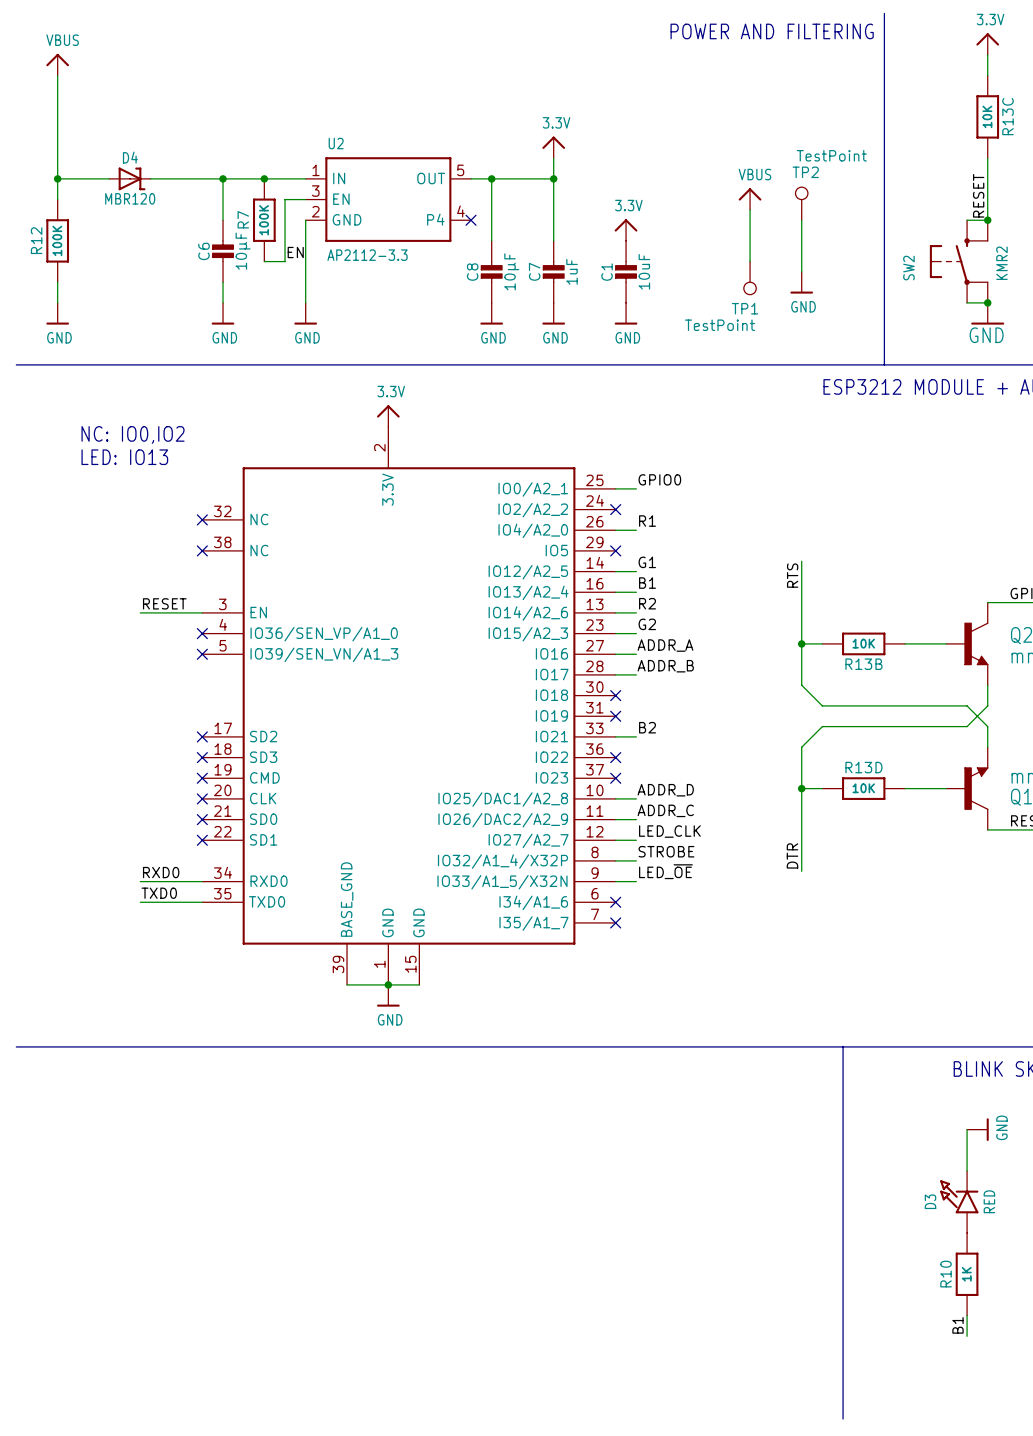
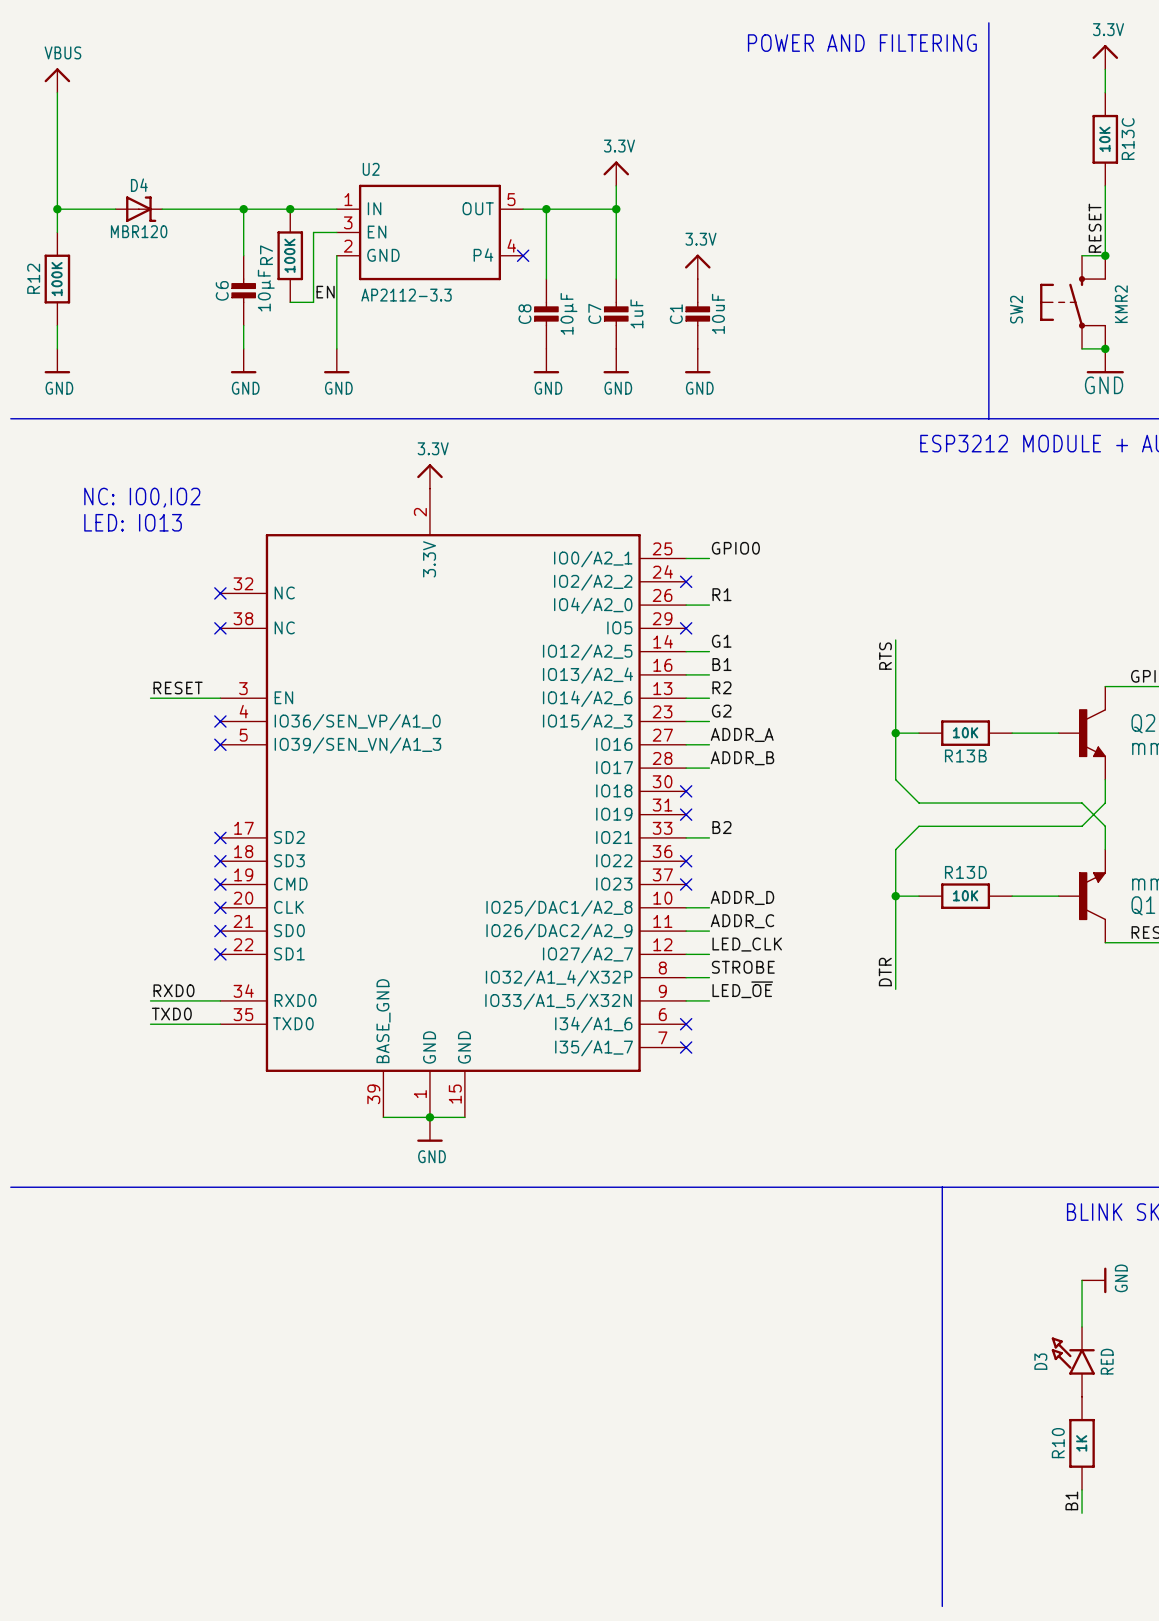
power symbol: VBUS (750, 199) -> none
TP2: TestPoint (801, 203) -> none
wire: (750, 209) (750, 261) -> none
wire: (801, 220) (801, 271) -> none
TP1: TestPoint (750, 278) -> none
power symbol: GND (801, 282) -> none

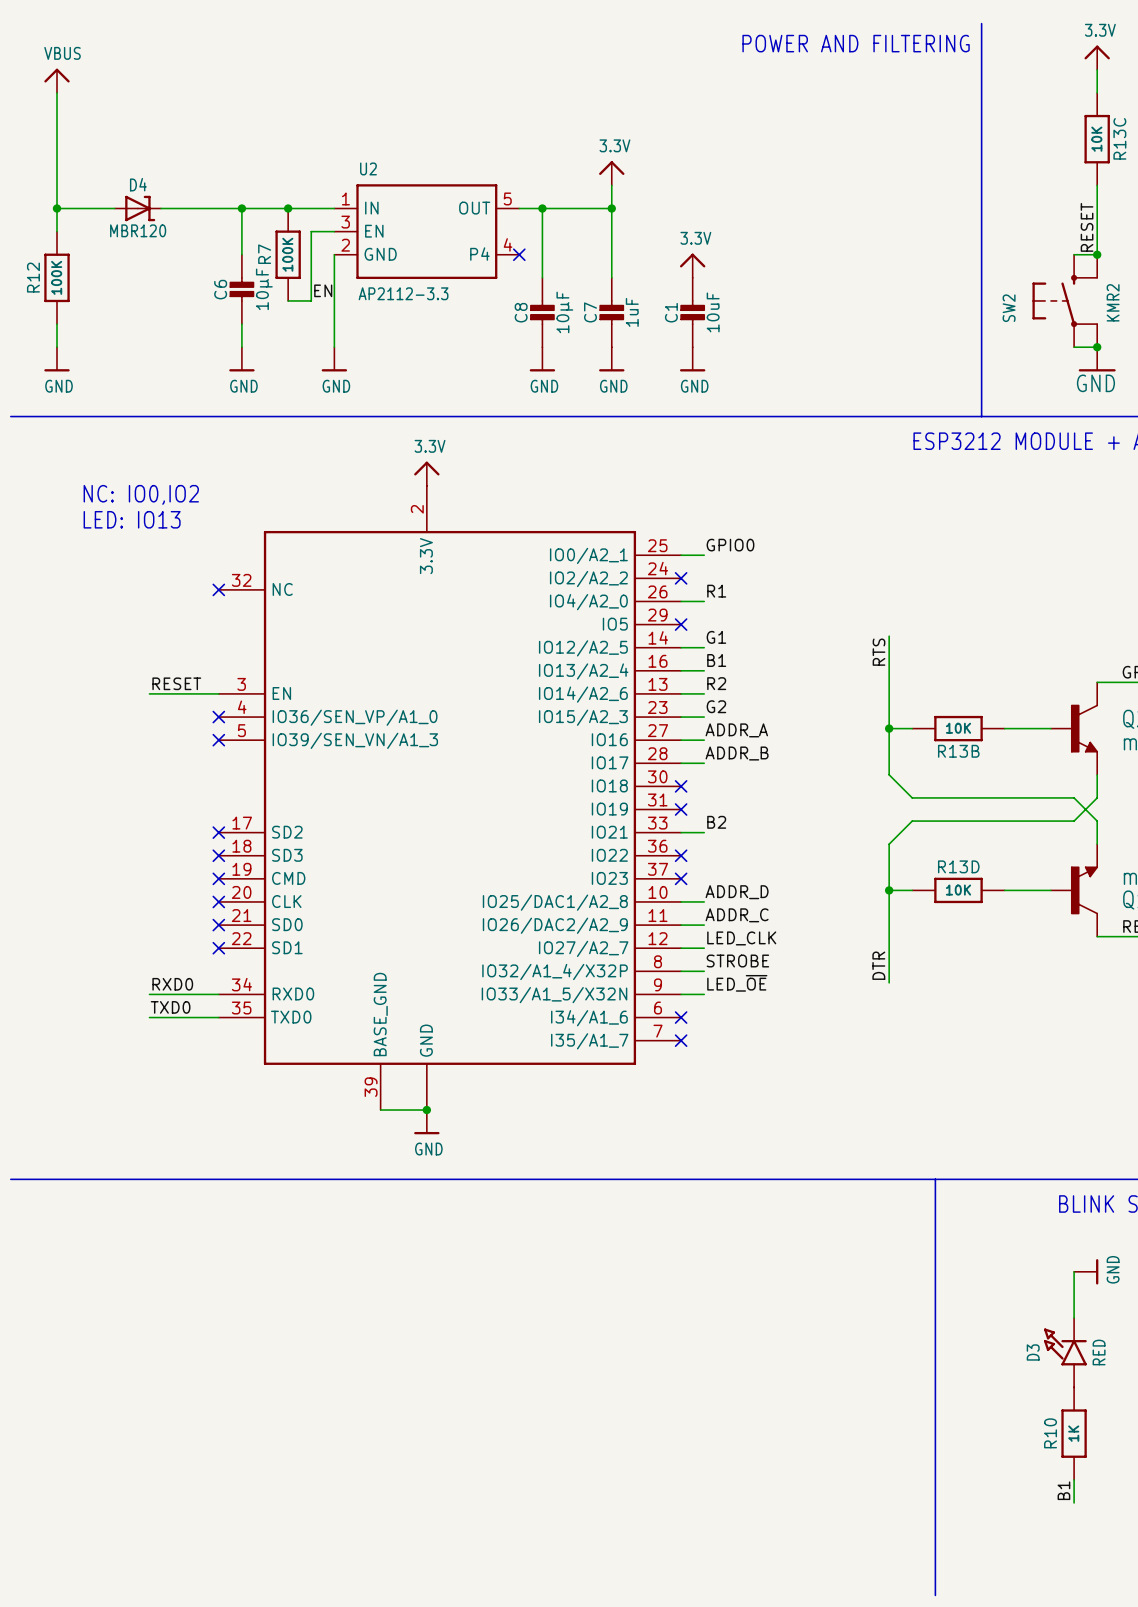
part symbol: [220, 488, 687, 1118] -> [218, 485, 682, 1111]
no-connect mark: (220, 628) -> none
wire: (429, 1117) (464, 1117) -> none

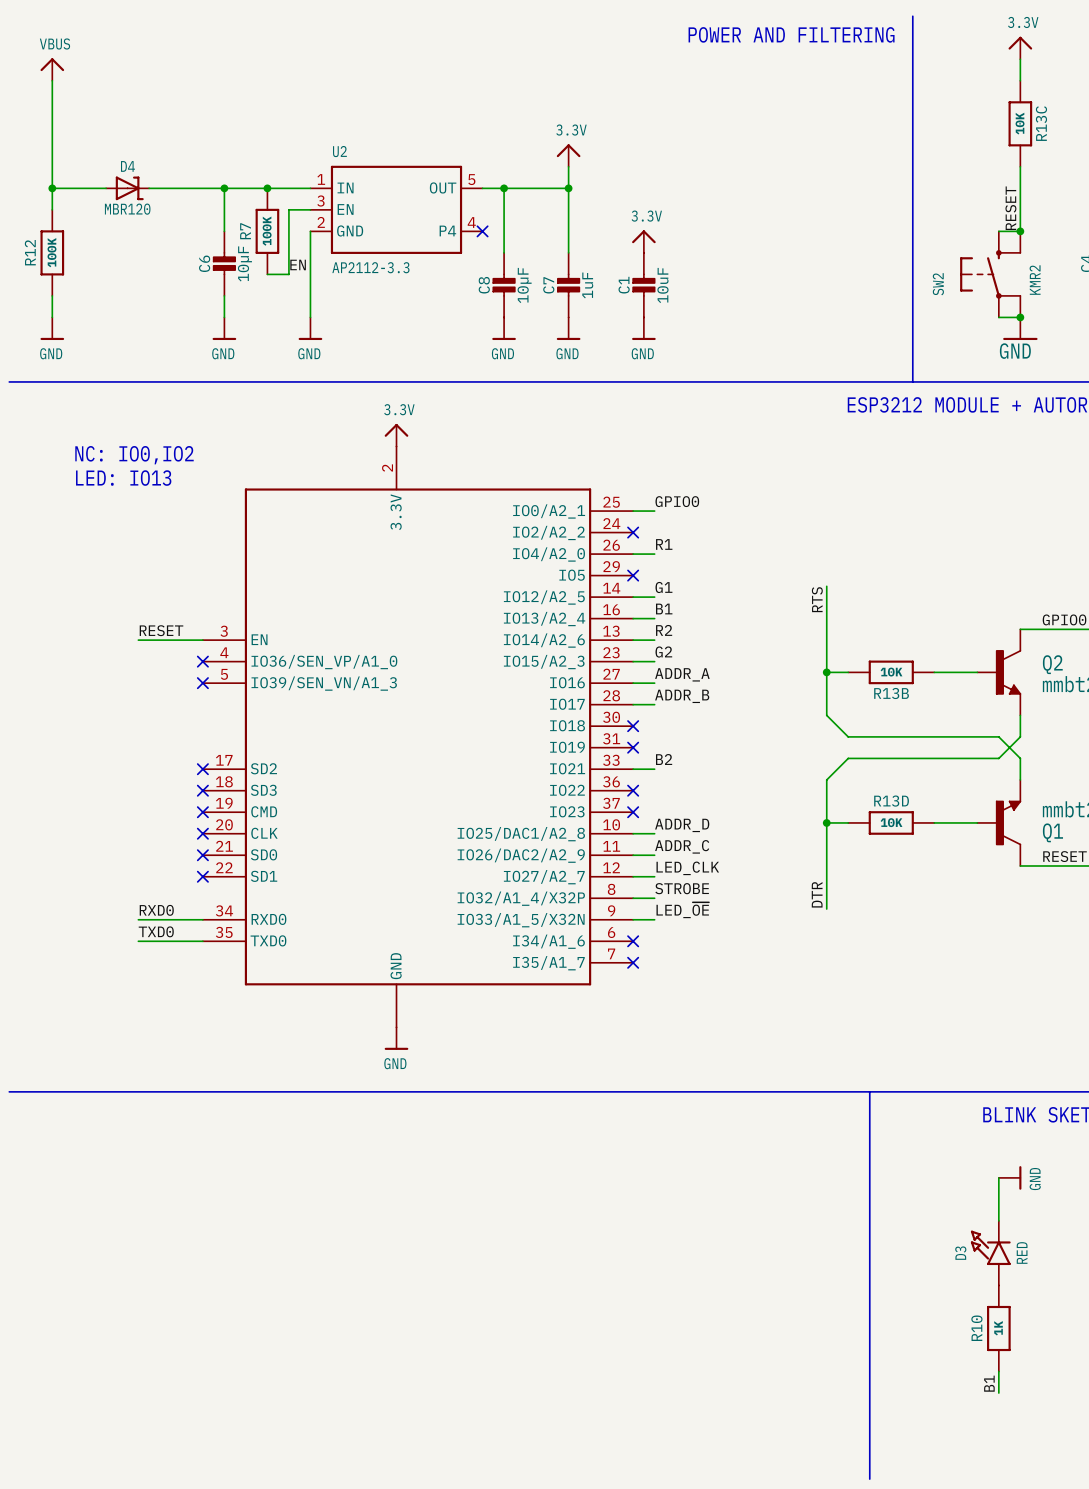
part symbol: [218, 485, 682, 1111] -> [202, 446, 634, 1028]
no-connect mark: (218, 589) -> none
wire: (380, 1110) (426, 1110) -> none
junction: (426, 1110) -> none

